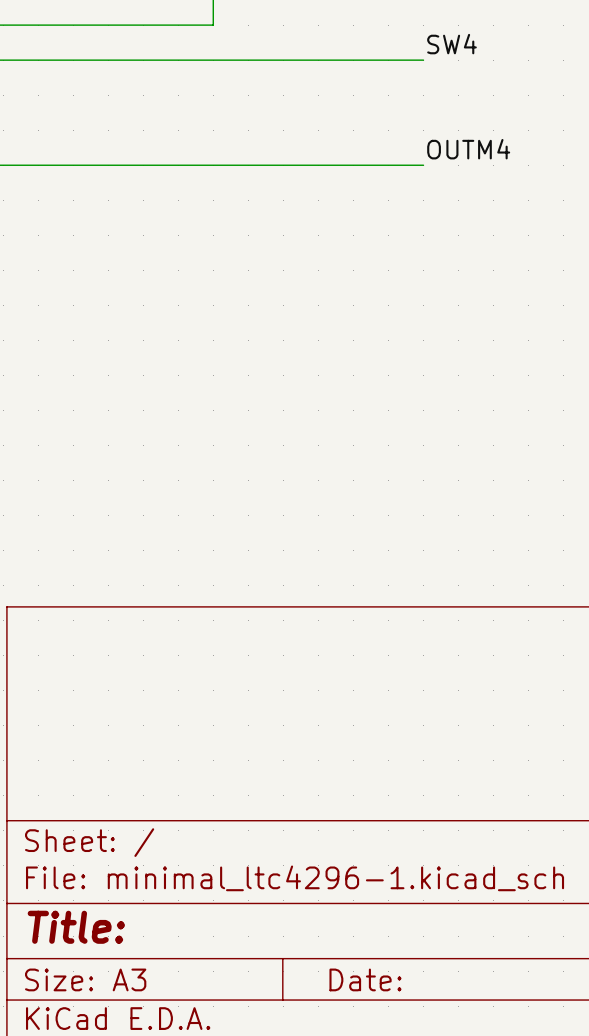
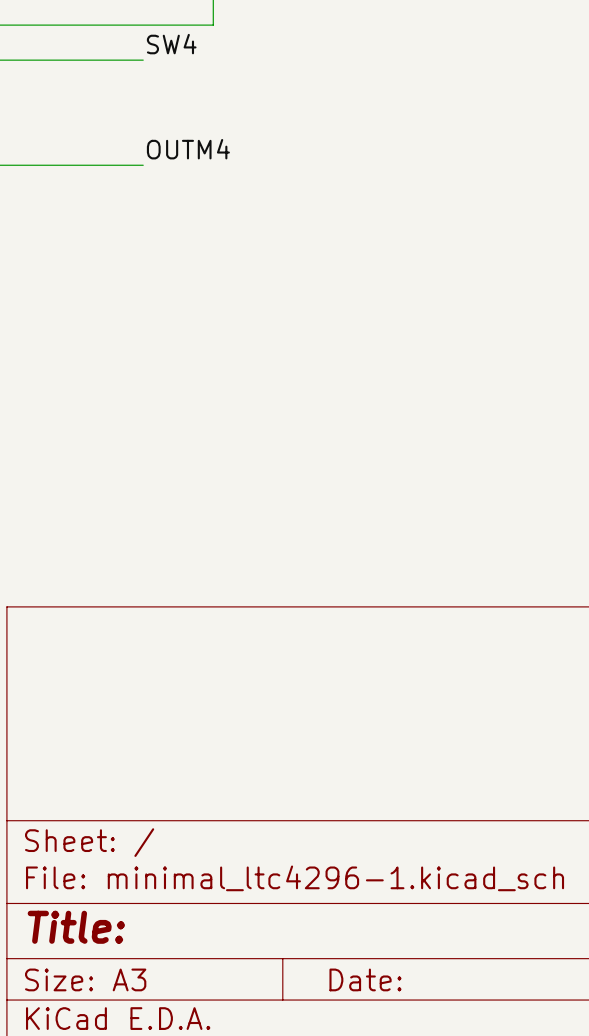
label position: SW4 (451, 44) -> SW4 (171, 44)
wire: (143, 60) (423, 60) -> none
label position: OUTM4 (468, 149) -> OUTM4 (188, 149)
wire: (143, 165) (423, 165) -> none

